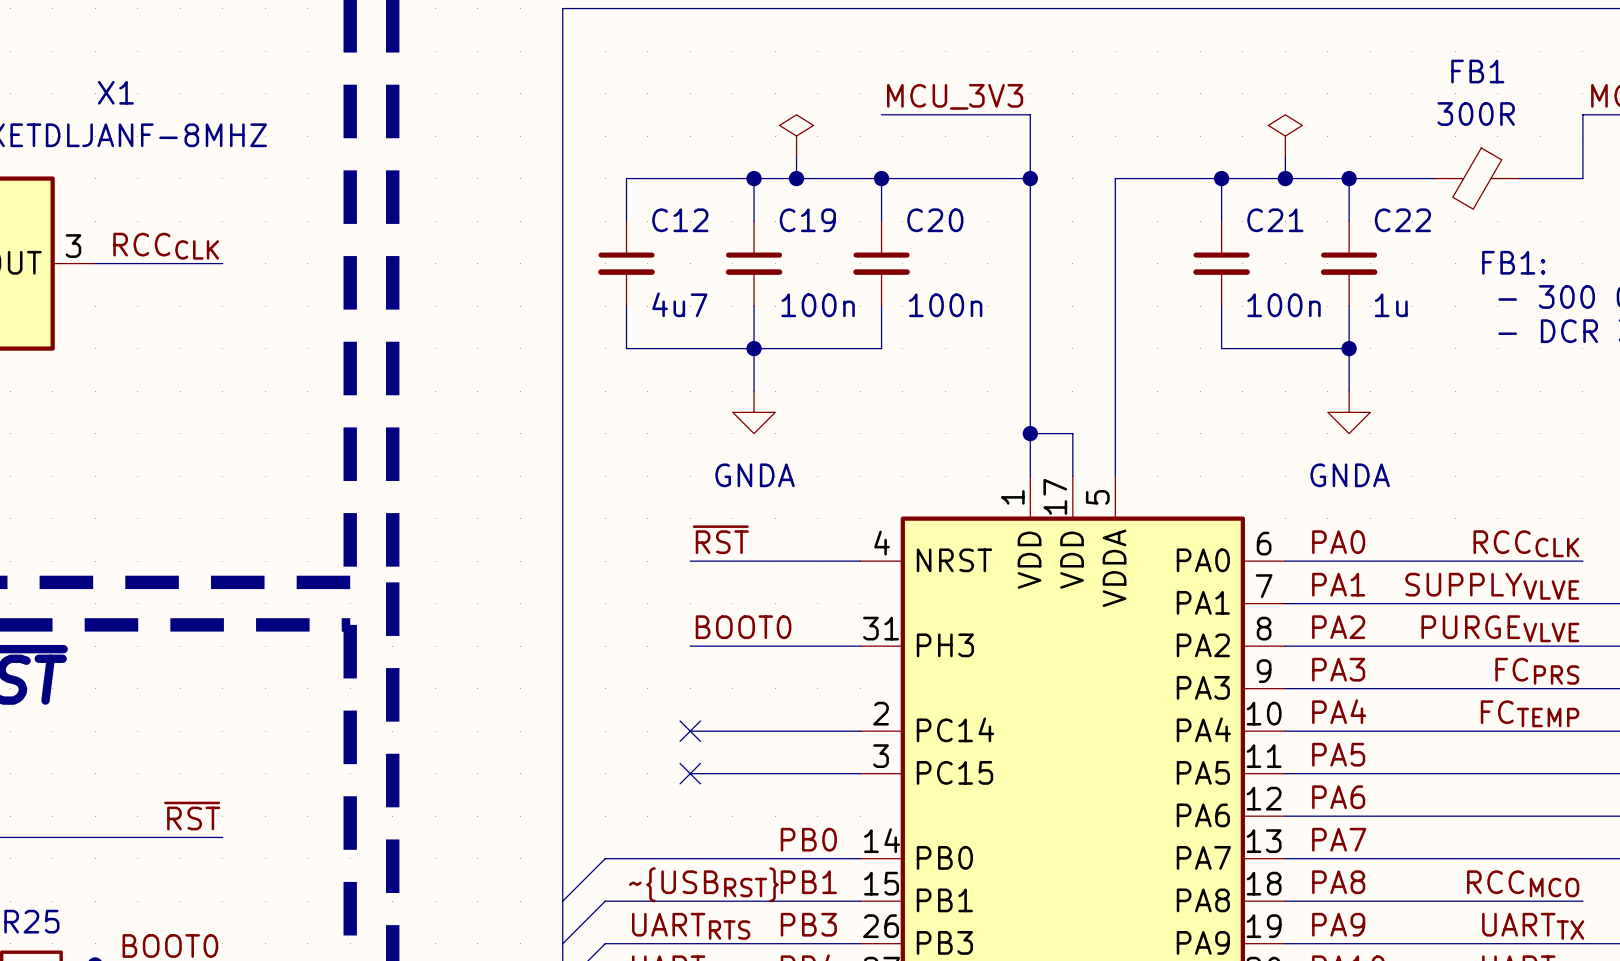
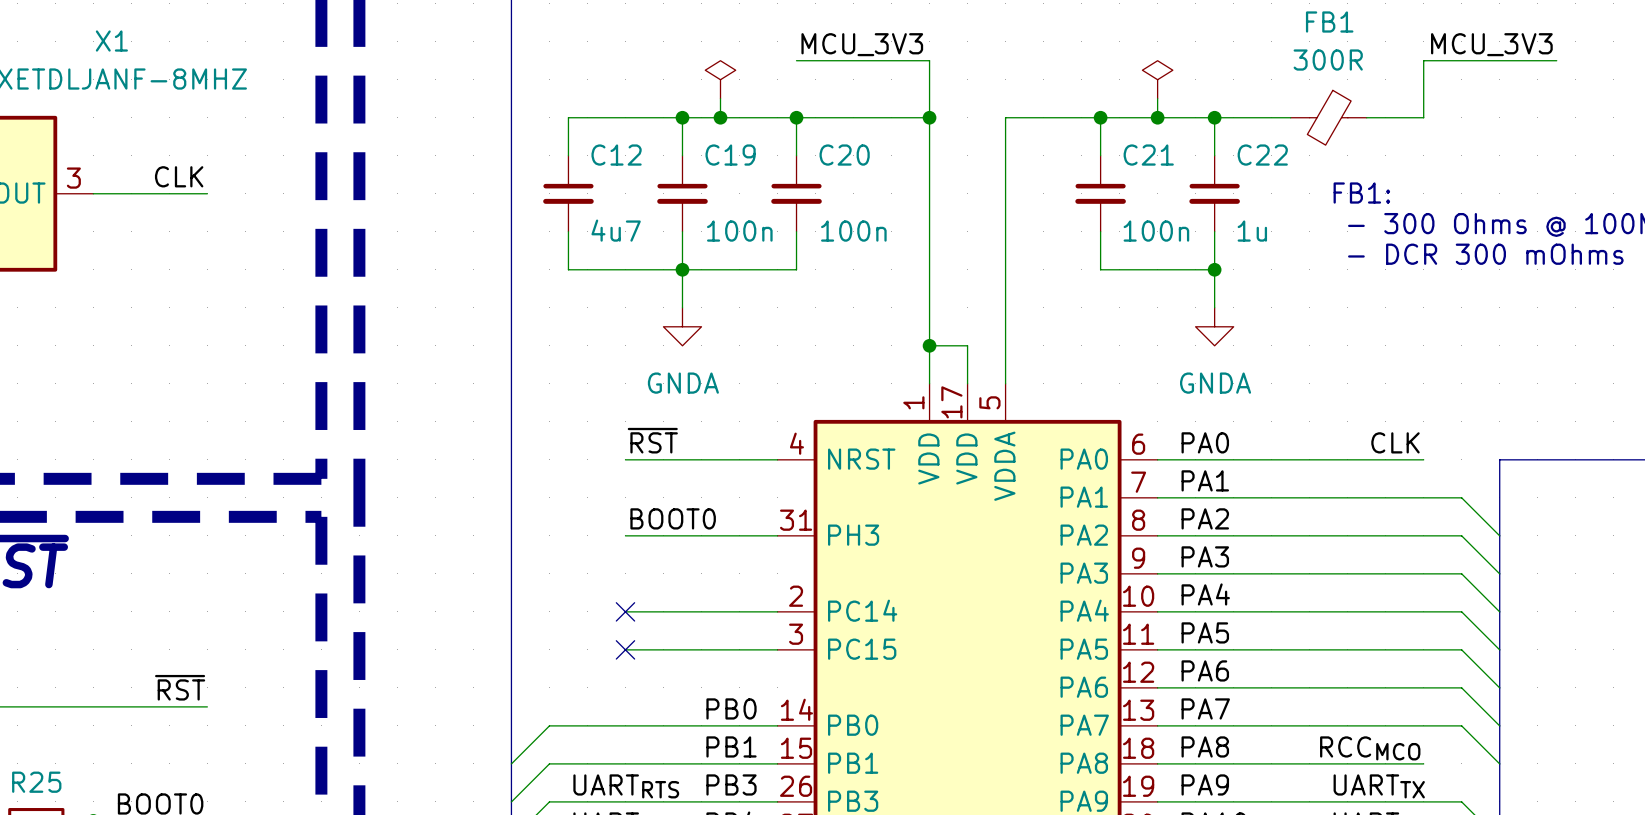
label: RCCCLK (166, 246) -> CLK (179, 176)
label: RCCCLK (1526, 543) -> CLK (1395, 442)
label: SUPPLYVLVE (1492, 586) -> none
label: PURGEVLVE (1500, 628) -> none
label: FCPRS (1537, 671) -> none
label: FCTEMP (1530, 713) -> none
label: ~{USBRST} (703, 884) -> none

